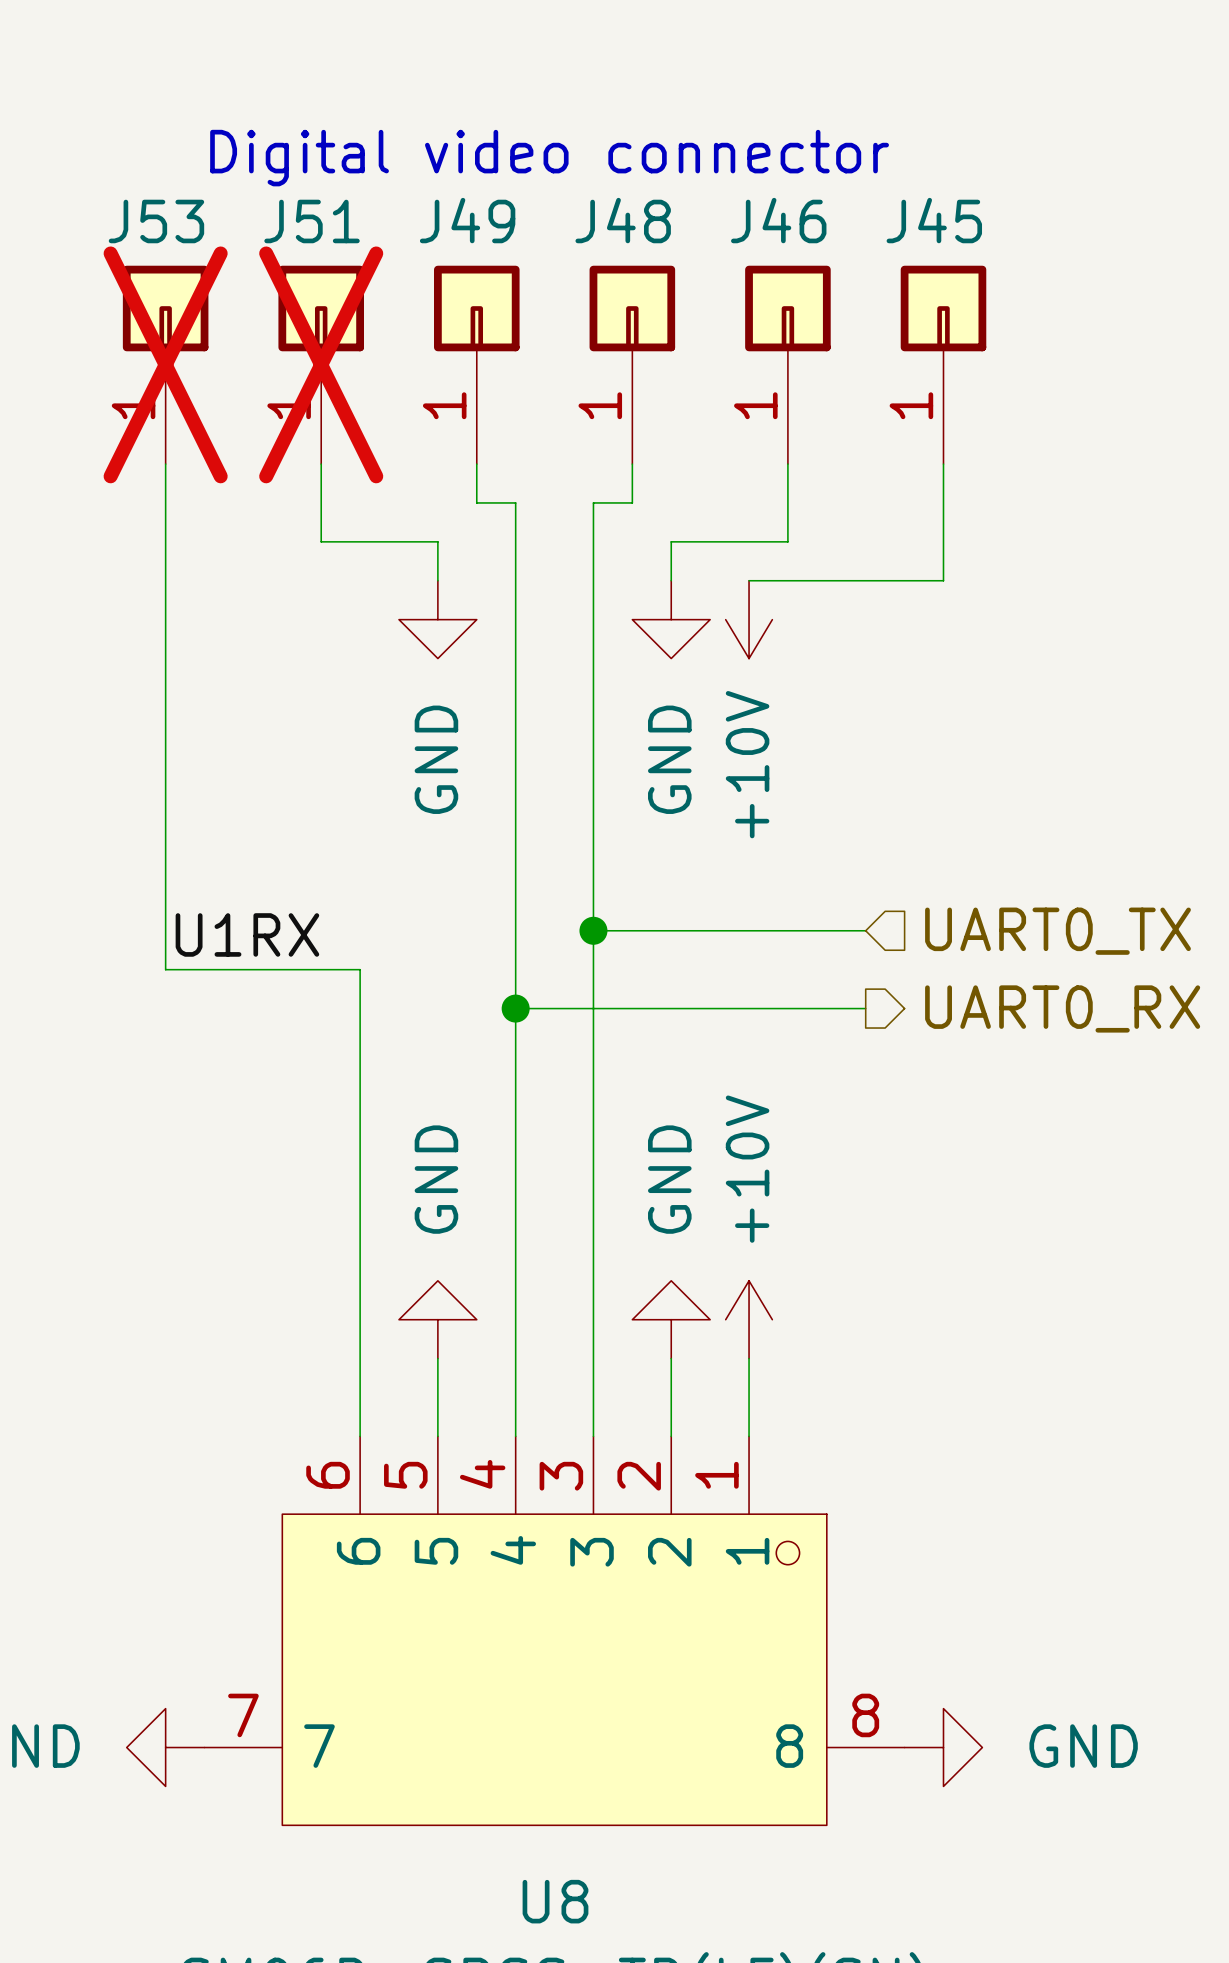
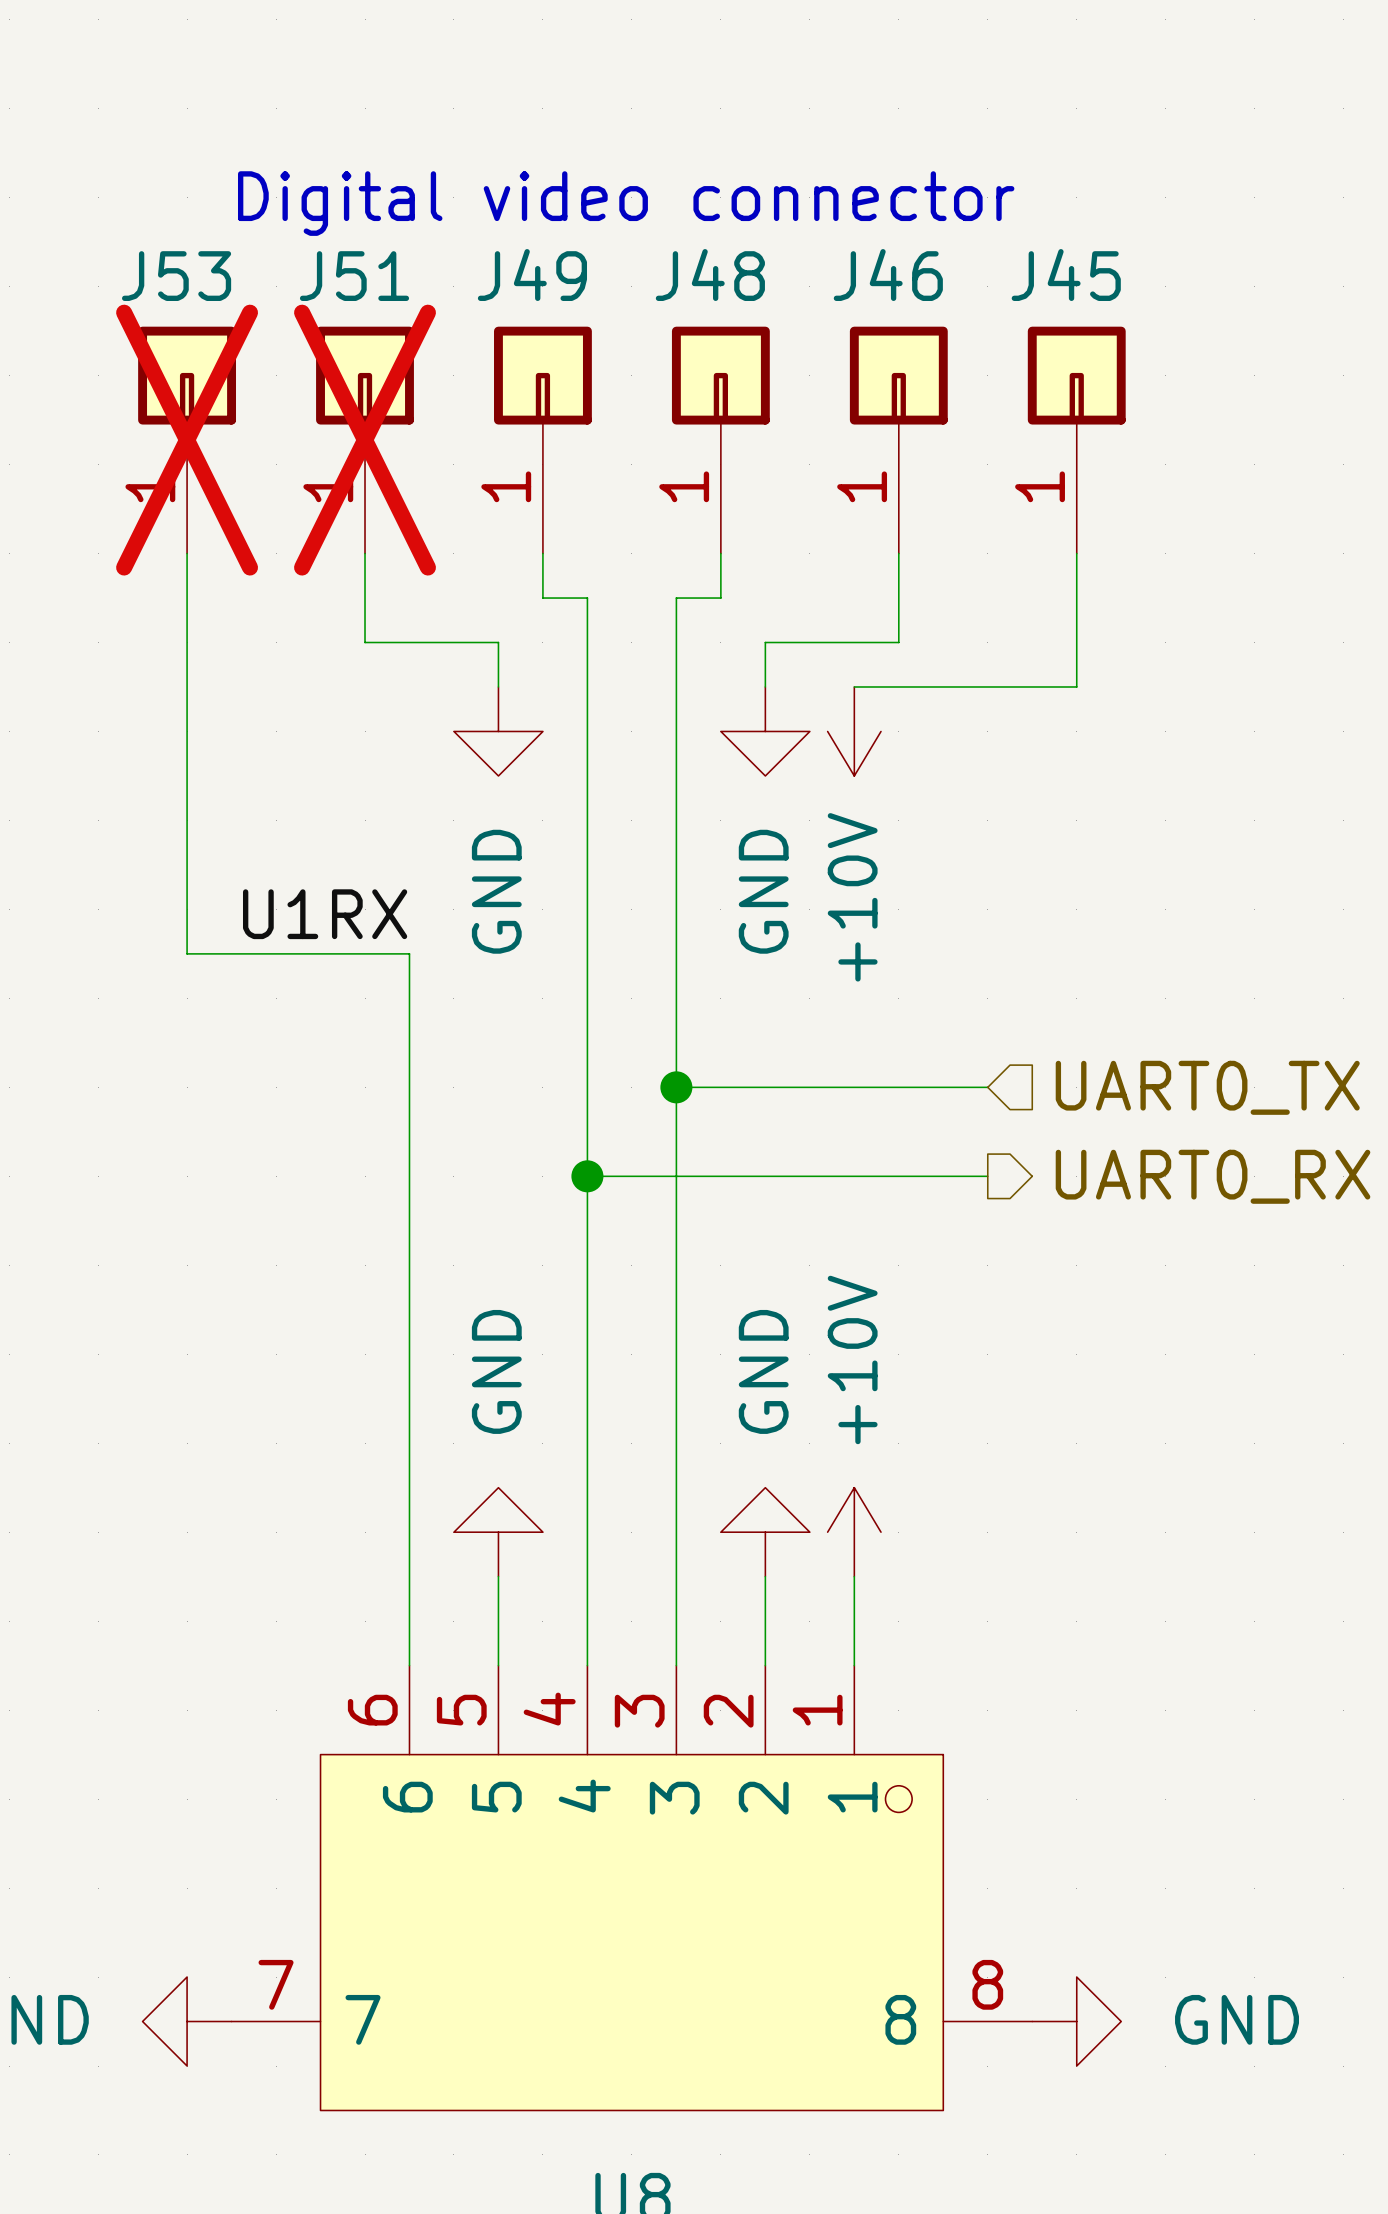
wire: (165, 814) (165, 969) (360, 969) -> (187, 953) (409, 953) (409, 1131)
label position: U1RX (247, 934) -> U1RX (325, 914)

